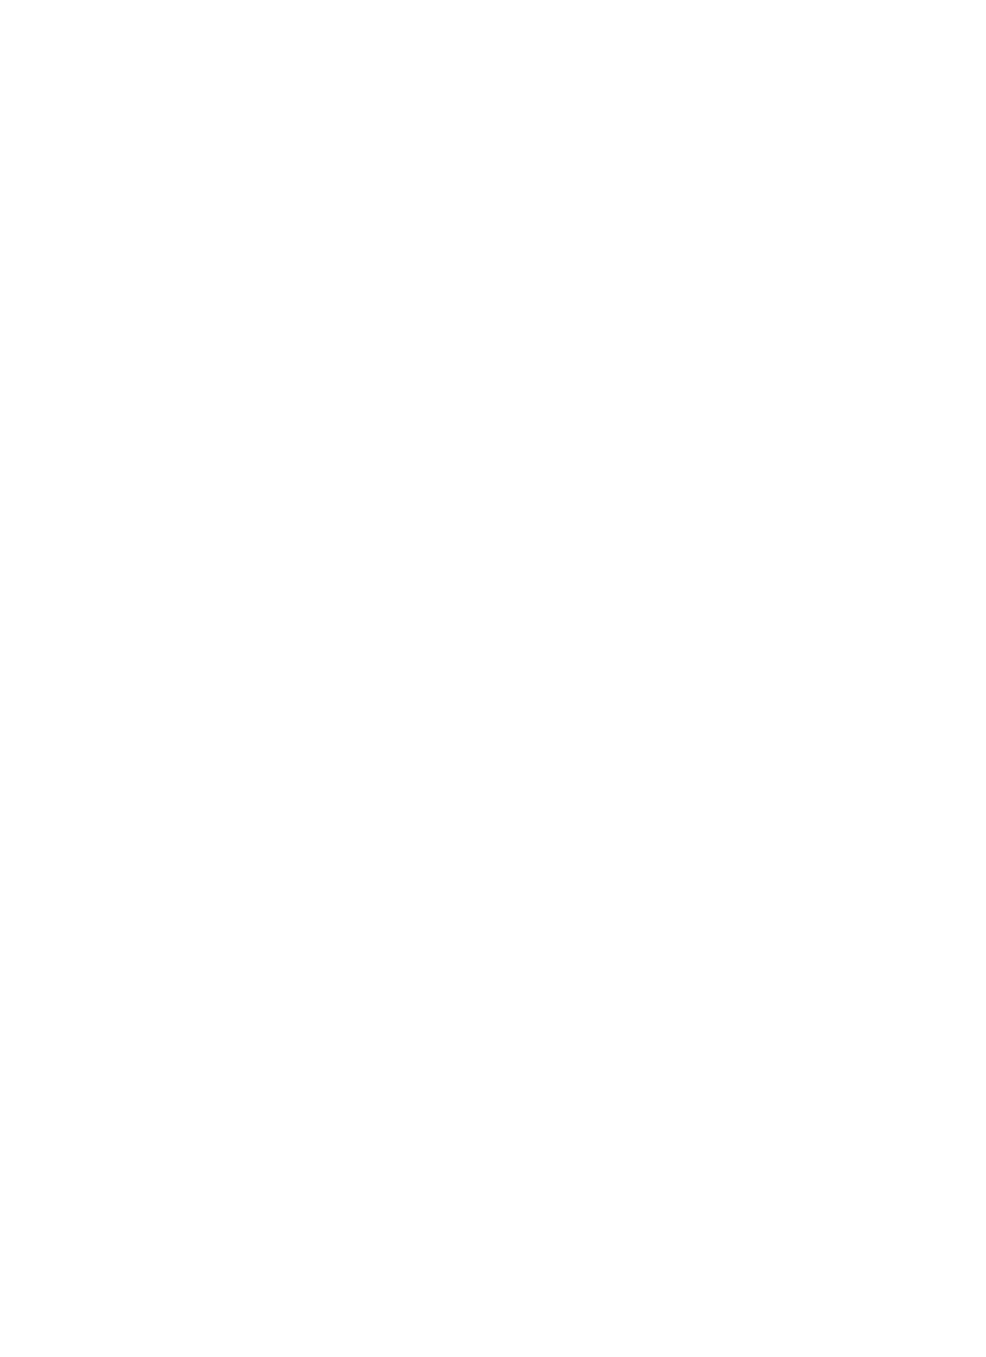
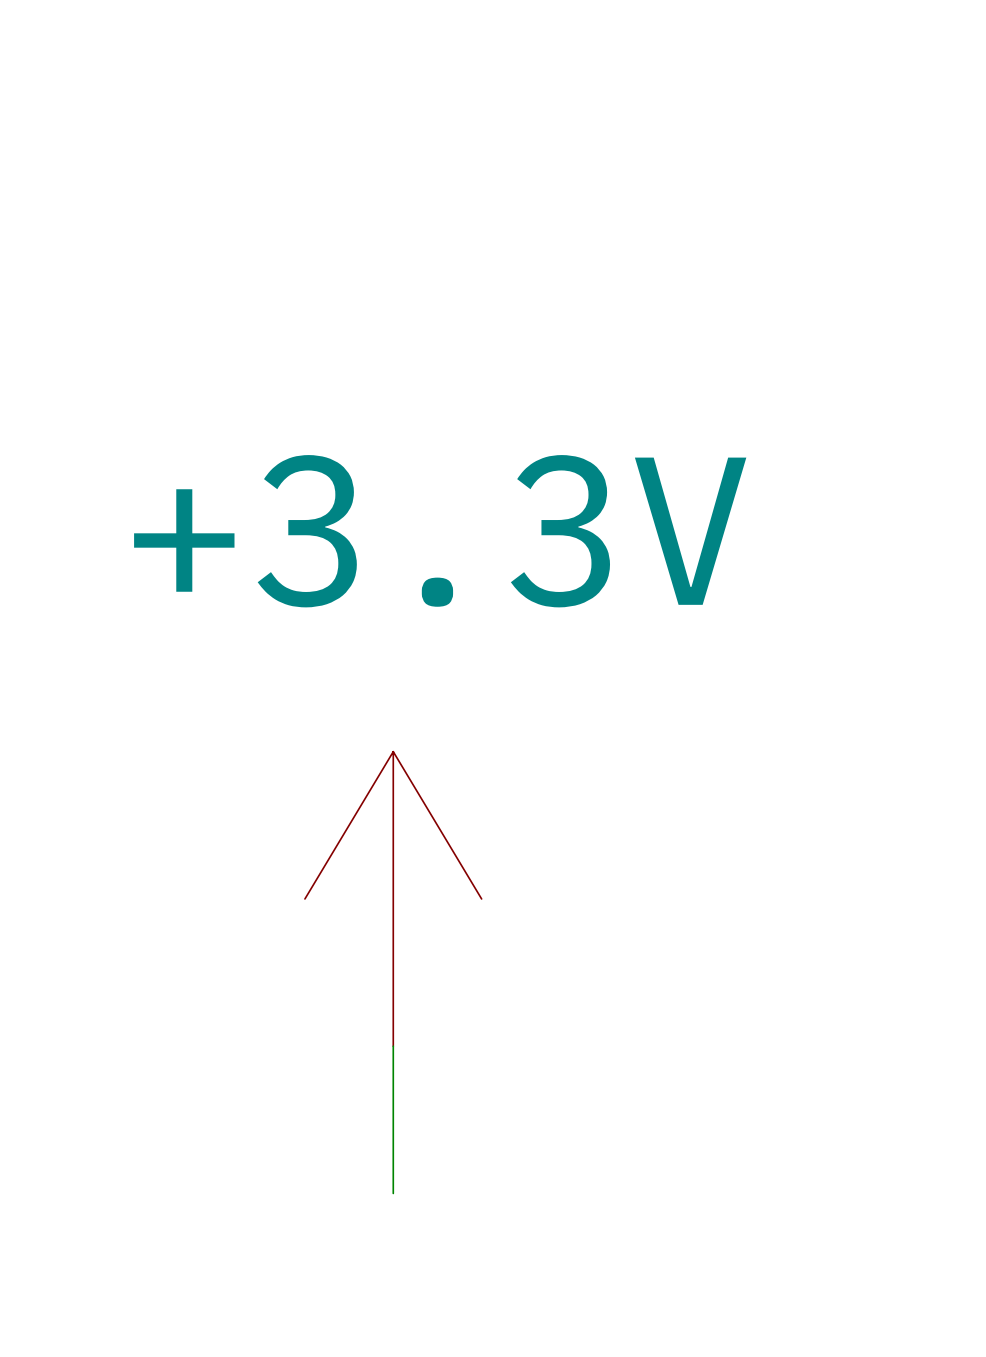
power symbol: none -> +3.3V (393, 898)
wire: none -> (393, 1046) (393, 1193)

